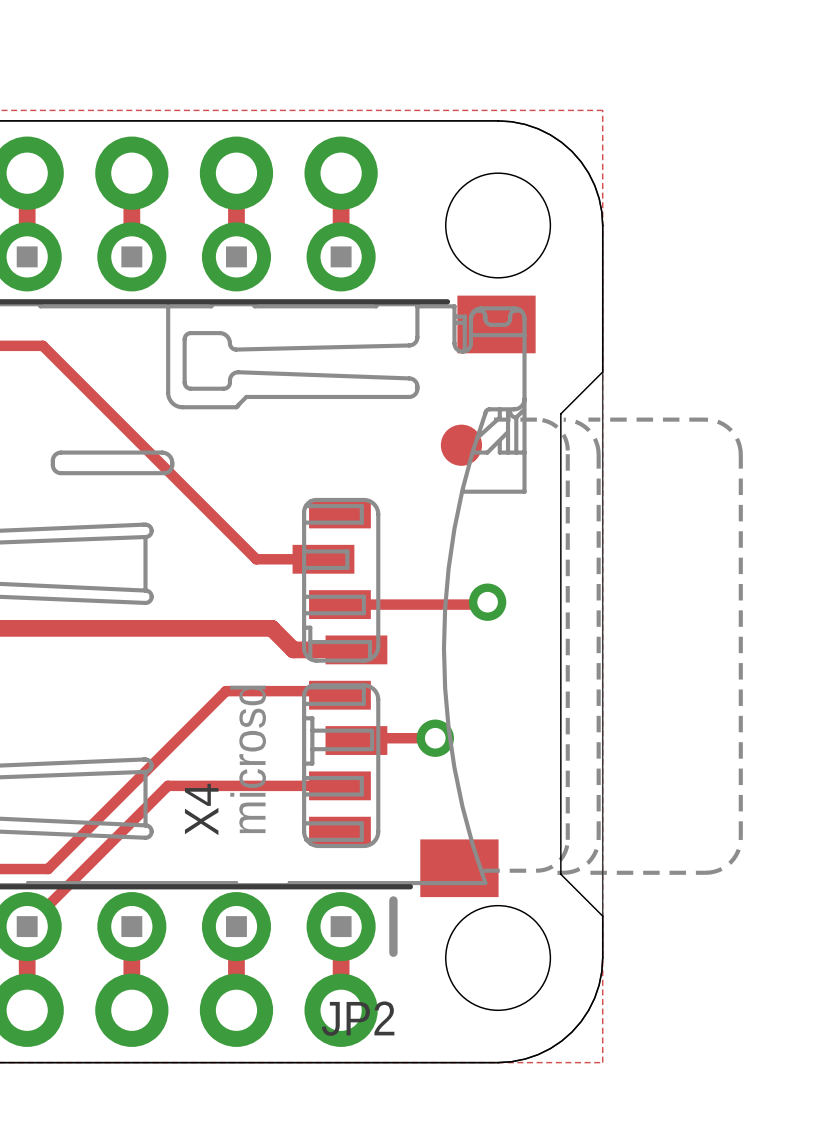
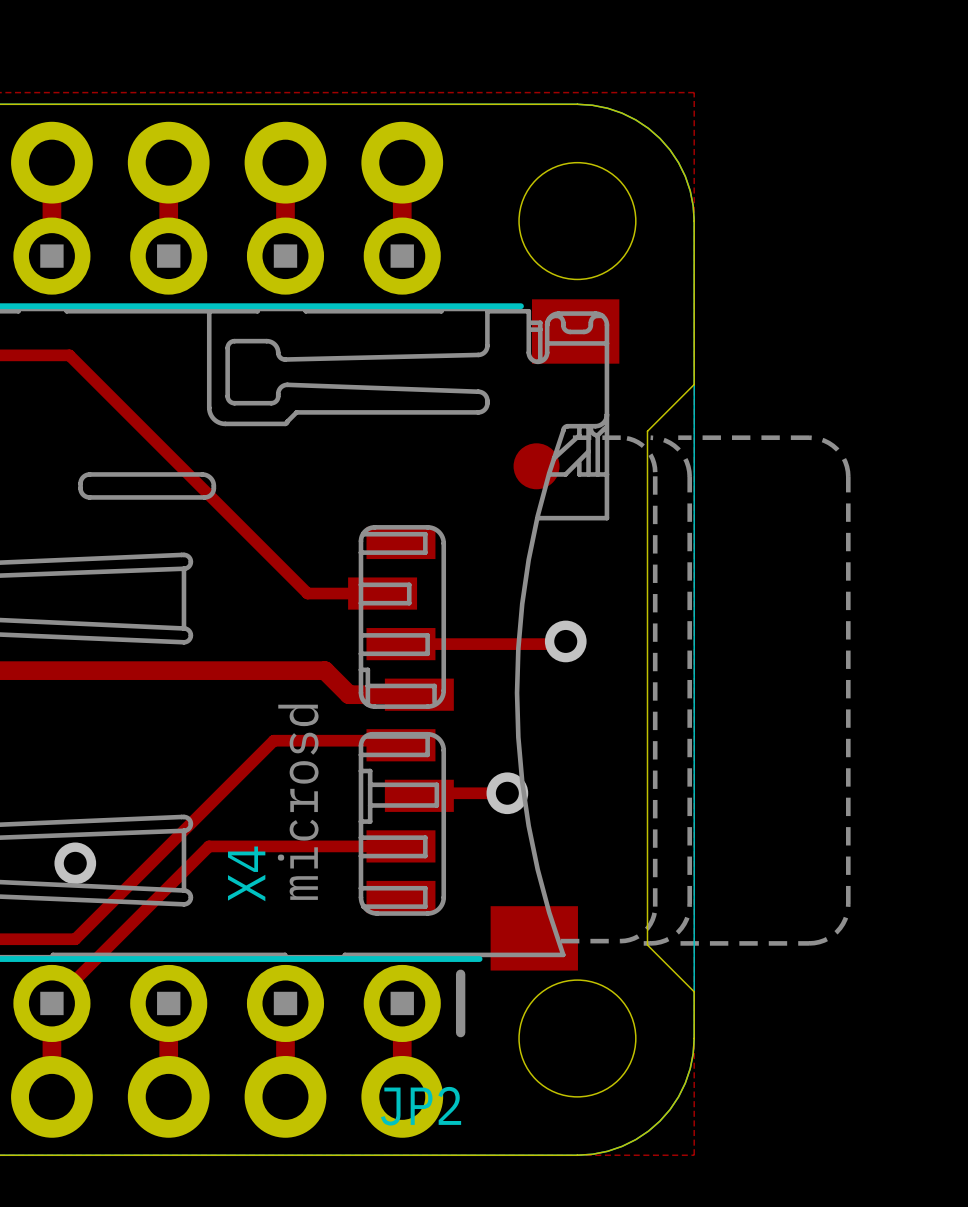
via: none -> (75, 863)

